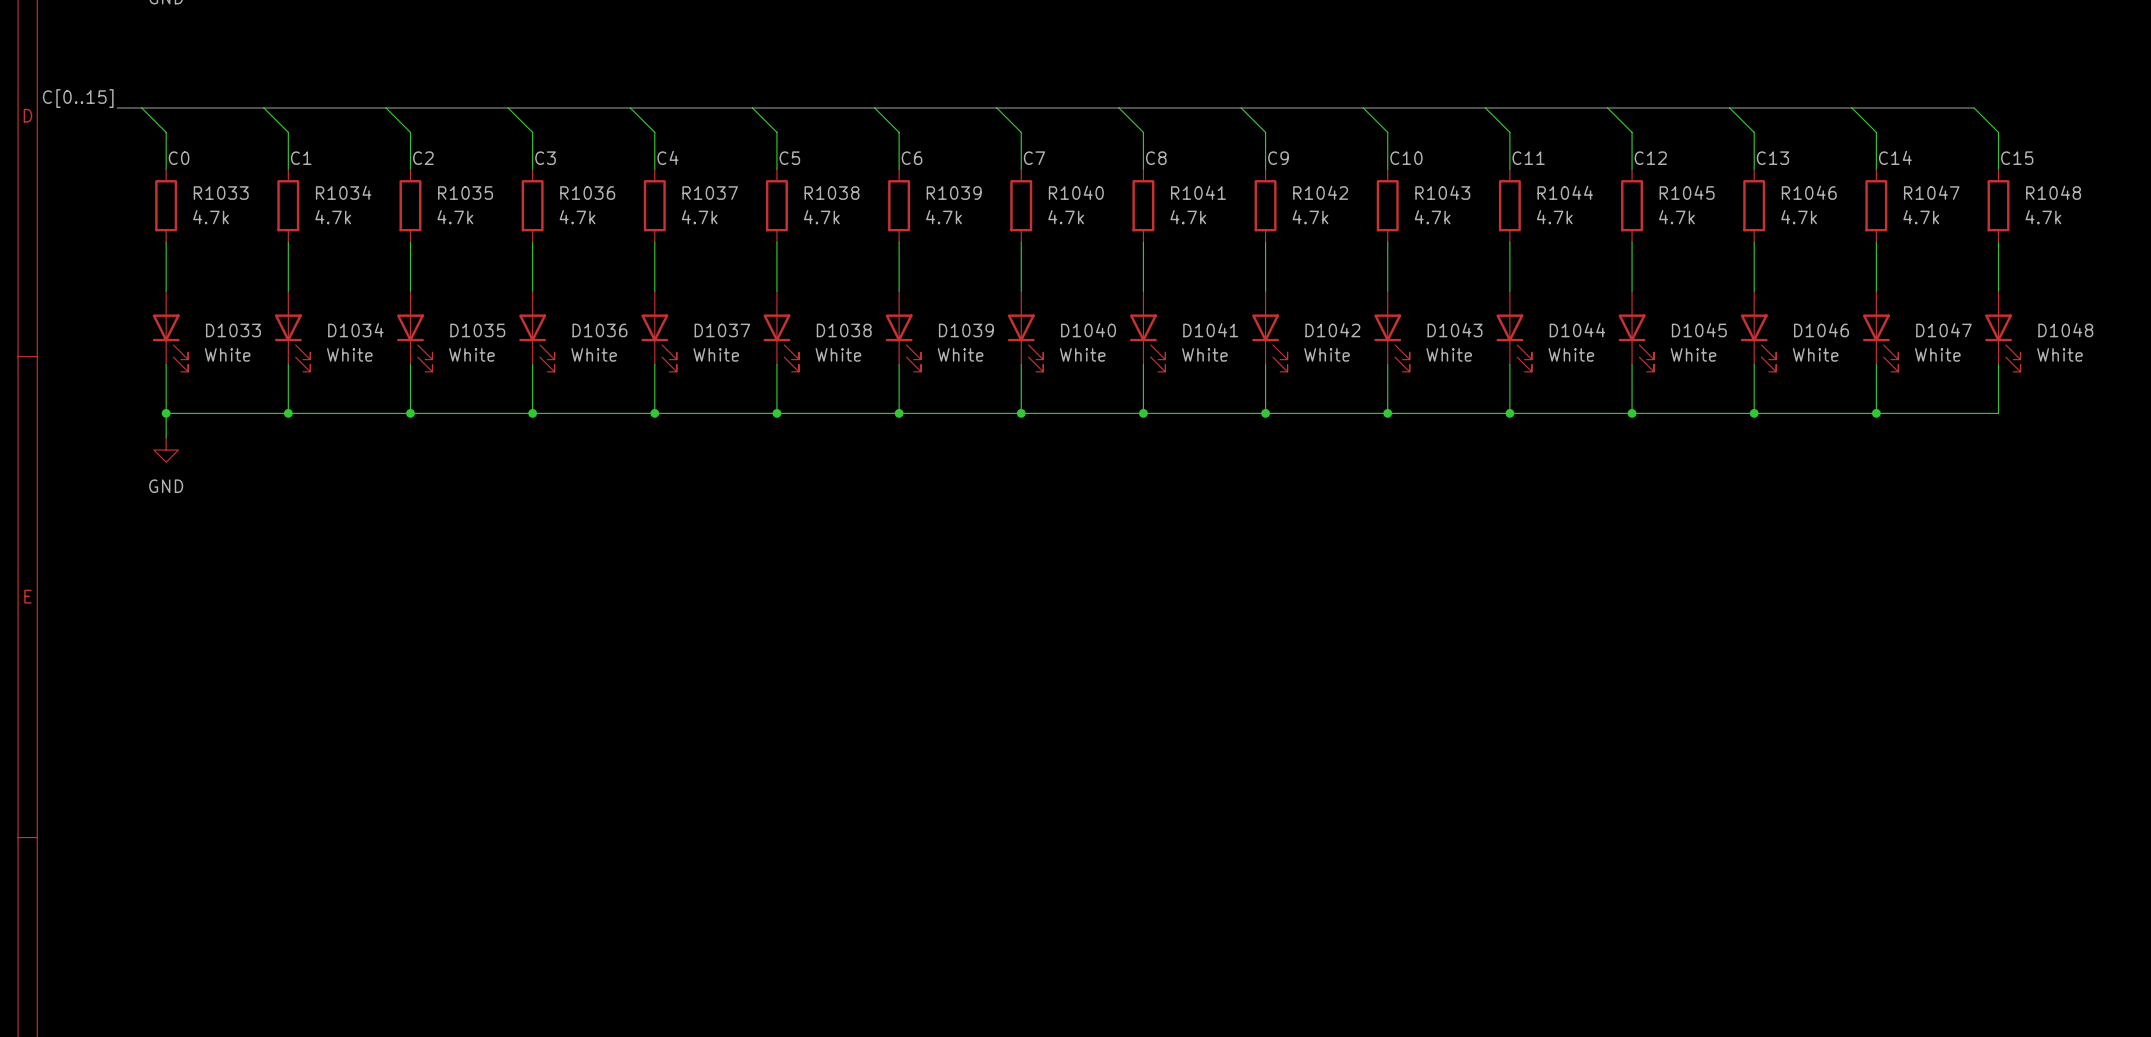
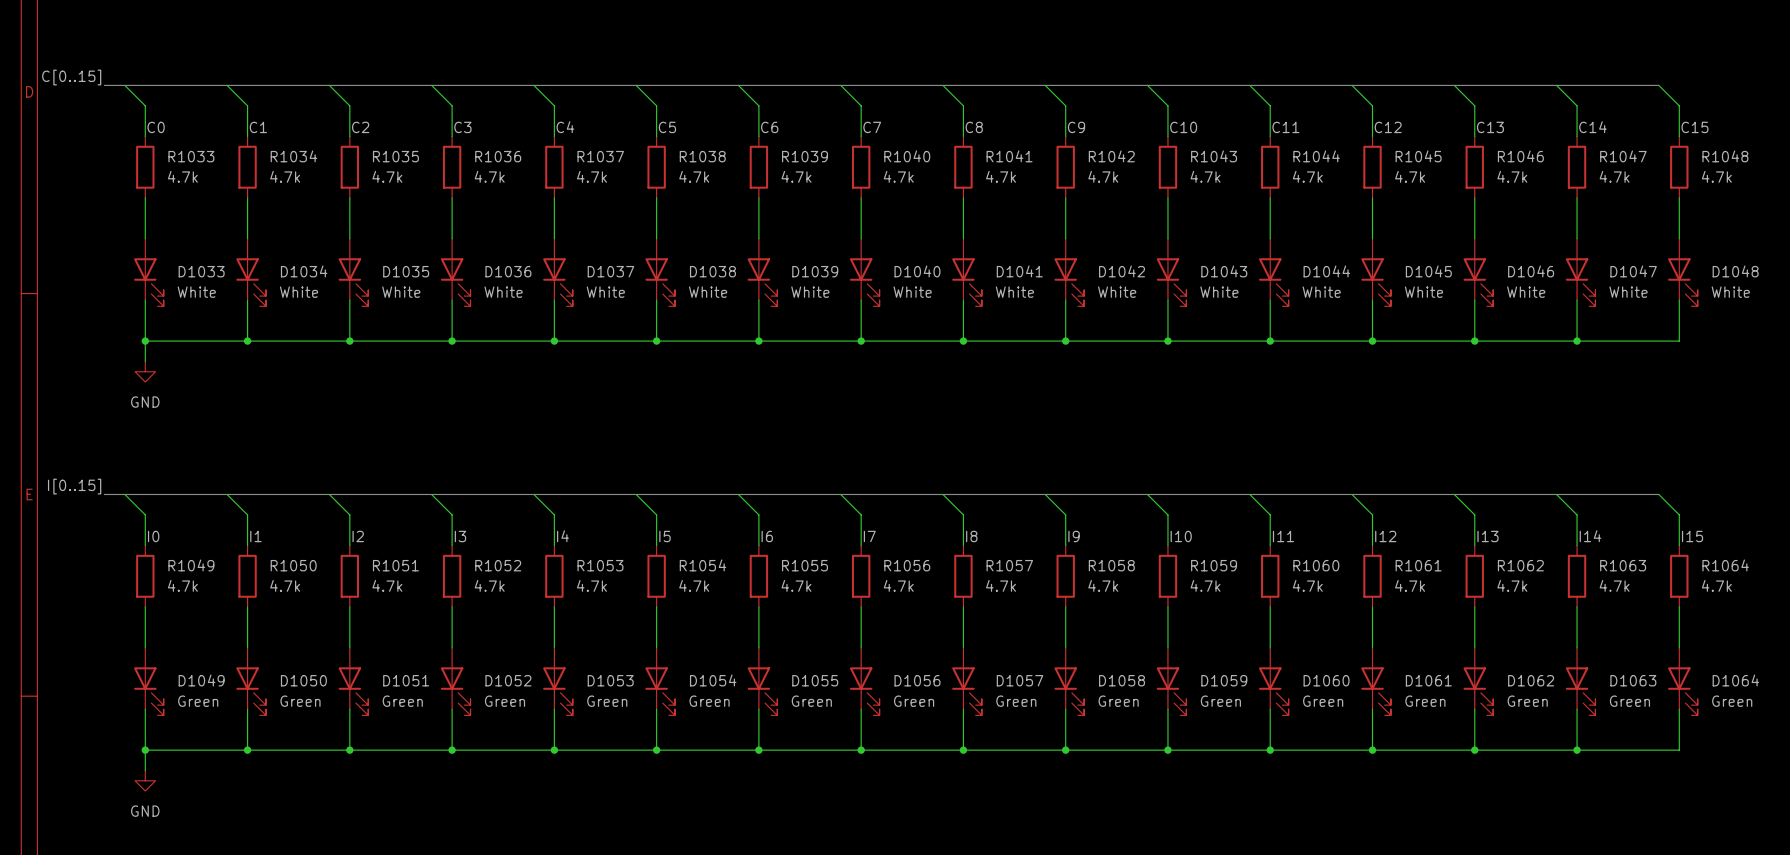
label: none -> I[0..15] (74, 486)
bus: none -> (104, 494) (1658, 494)
wire: none -> (124, 494) (145, 514) (145, 545)
wire: none -> (227, 494) (247, 514) (247, 545)
wire: none -> (329, 494) (349, 514) (349, 545)
wire: none -> (431, 494) (452, 514) (452, 545)
wire: none -> (533, 494) (554, 514) (554, 545)
wire: none -> (636, 494) (656, 514) (656, 545)
wire: none -> (738, 494) (758, 514) (758, 545)
wire: none -> (840, 494) (861, 514) (861, 545)
wire: none -> (942, 494) (963, 514) (963, 545)
wire: none -> (1045, 494) (1065, 514) (1065, 545)
wire: none -> (1147, 494) (1167, 514) (1167, 545)
wire: none -> (1249, 494) (1270, 514) (1270, 545)
wire: none -> (1352, 494) (1372, 514) (1372, 545)
wire: none -> (1454, 494) (1474, 514) (1474, 545)
wire: none -> (1556, 494) (1577, 514) (1577, 545)
wire: none -> (1658, 494) (1679, 514) (1679, 545)
label: none -> I0 (153, 536)
label: none -> I1 (255, 536)
label: none -> I2 (358, 536)
label: none -> I3 (460, 536)
label: none -> I4 (562, 536)
label: none -> I5 (664, 536)
label: none -> I6 (767, 536)
label: none -> I7 (869, 536)
label: none -> I8 (971, 536)
label: none -> I9 (1074, 536)
label: none -> I10 (1181, 536)
label: none -> I11 (1283, 536)
label: none -> I12 (1385, 536)
label: none -> I13 (1487, 536)
label: none -> I14 (1590, 536)
label: none -> I15 (1692, 536)
R1049: none -> 4.7k (145, 576)
R1050: none -> 4.7k (247, 576)
R1051: none -> 4.7k (349, 576)
R1052: none -> 4.7k (452, 576)
R1053: none -> 4.7k (554, 576)
R1054: none -> 4.7k (656, 576)
R1055: none -> 4.7k (758, 576)
R1056: none -> 4.7k (861, 576)
R1057: none -> 4.7k (963, 576)
R1058: none -> 4.7k (1065, 576)
R1059: none -> 4.7k (1167, 576)
R1060: none -> 4.7k (1270, 576)
R1061: none -> 4.7k (1372, 576)
R1062: none -> 4.7k (1474, 576)
R1063: none -> 4.7k (1577, 576)
R1064: none -> 4.7k (1679, 576)
wire: none -> (145, 606) (145, 647)
wire: none -> (247, 606) (247, 647)
wire: none -> (349, 606) (349, 647)
wire: none -> (452, 606) (452, 647)
wire: none -> (554, 606) (554, 647)
wire: none -> (656, 606) (656, 647)
wire: none -> (758, 606) (758, 647)
wire: none -> (861, 606) (861, 647)
wire: none -> (963, 606) (963, 647)
wire: none -> (1065, 606) (1065, 647)
wire: none -> (1167, 606) (1167, 647)
wire: none -> (1270, 606) (1270, 647)
wire: none -> (1372, 606) (1372, 647)
wire: none -> (1474, 606) (1474, 647)
wire: none -> (1577, 606) (1577, 647)
wire: none -> (1679, 606) (1679, 647)
D1049: none -> Green (148, 681)
D1050: none -> Green (251, 681)
D1051: none -> Green (353, 681)
D1052: none -> Green (455, 681)
D1053: none -> Green (557, 681)
D1054: none -> Green (660, 681)
D1055: none -> Green (762, 681)
D1056: none -> Green (864, 681)
D1057: none -> Green (967, 681)
D1058: none -> Green (1069, 681)
D1059: none -> Green (1171, 681)
D1060: none -> Green (1273, 681)
D1061: none -> Green (1376, 681)
D1062: none -> Green (1478, 681)
D1063: none -> Green (1580, 681)
D1064: none -> Green (1682, 681)
wire: none -> (145, 709) (145, 770)
wire: none -> (247, 709) (247, 750)
wire: none -> (349, 709) (349, 750)
wire: none -> (452, 709) (452, 750)
wire: none -> (554, 709) (554, 750)
wire: none -> (656, 709) (656, 750)
wire: none -> (758, 709) (758, 750)
wire: none -> (861, 709) (861, 750)
wire: none -> (963, 709) (963, 750)
wire: none -> (1065, 709) (1065, 750)
wire: none -> (1167, 709) (1167, 750)
wire: none -> (1270, 709) (1270, 750)
wire: none -> (1372, 709) (1372, 750)
wire: none -> (1474, 709) (1474, 750)
wire: none -> (1577, 709) (1577, 750)
wire: none -> (1679, 709) (1679, 750) (145, 750)
junction: none -> (145, 750)
junction: none -> (247, 750)
junction: none -> (349, 750)
junction: none -> (452, 750)
junction: none -> (554, 750)
junction: none -> (656, 750)
junction: none -> (758, 750)
junction: none -> (861, 750)
junction: none -> (963, 750)
junction: none -> (1065, 750)
junction: none -> (1167, 750)
junction: none -> (1270, 750)
junction: none -> (1372, 750)
junction: none -> (1474, 750)
junction: none -> (1577, 750)
power symbol: none -> GND (145, 780)

